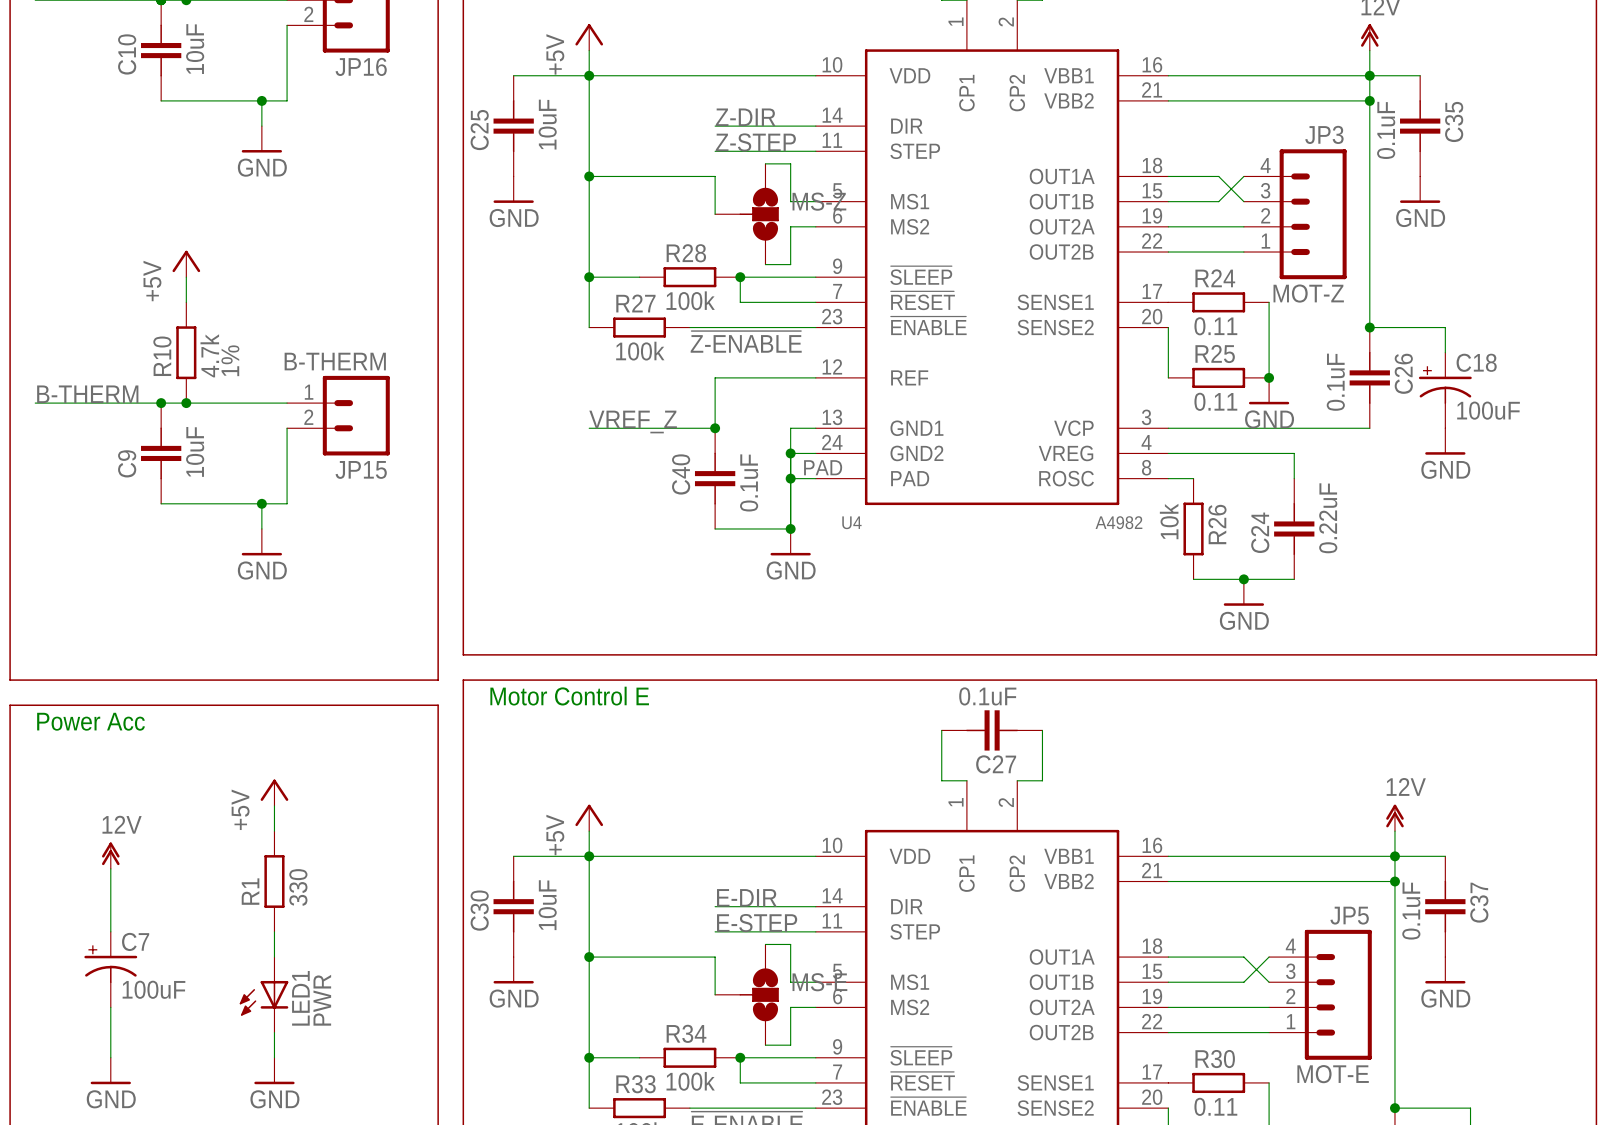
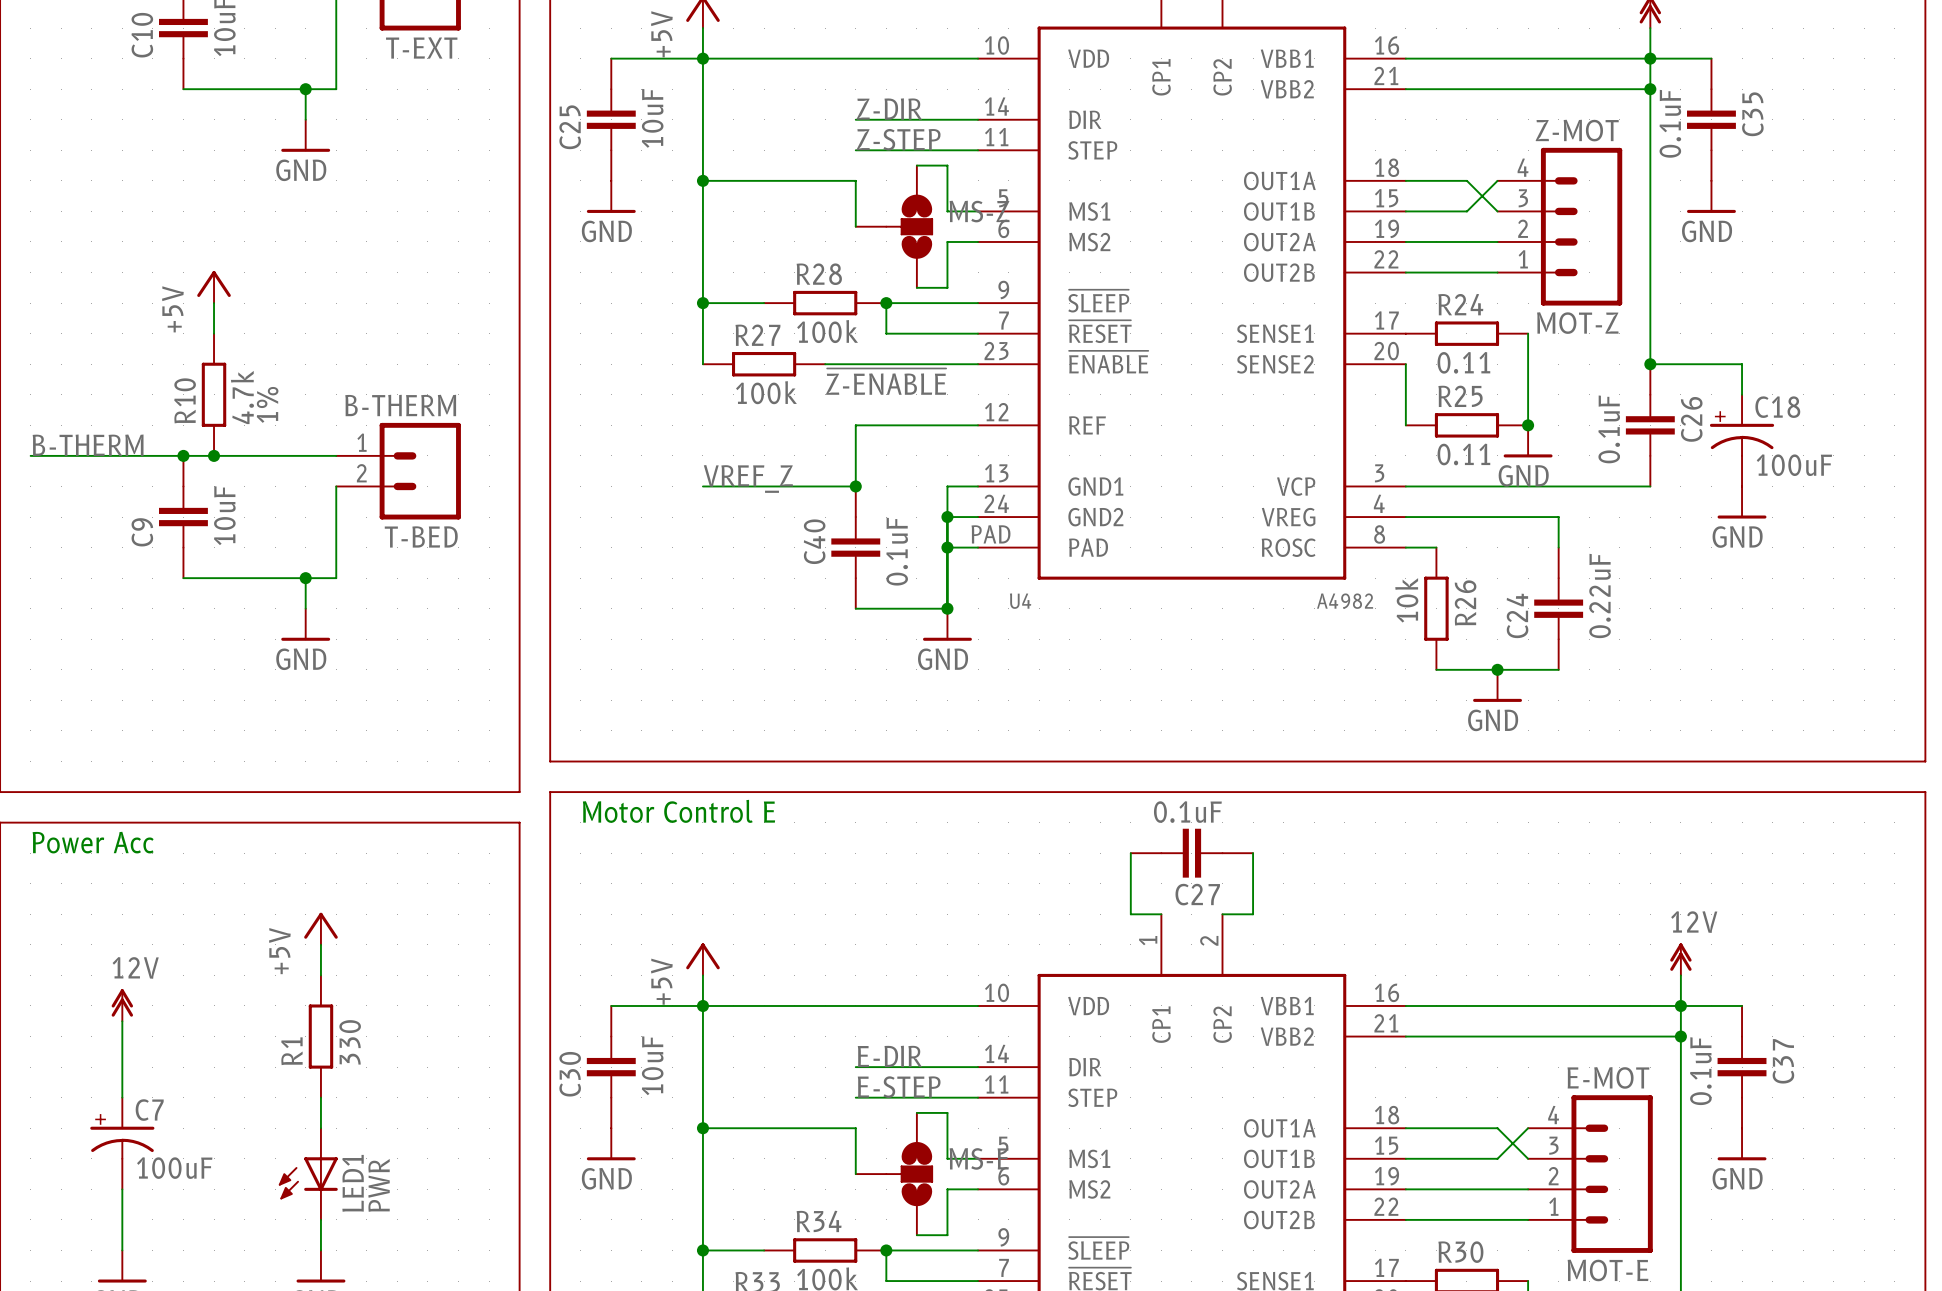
JP16 name: JP16 (361, 66) -> T-EXT (421, 47)
JP3 name: JP3 (1324, 134) -> Z-MOT (1577, 130)
JP15 name: JP15 (361, 469) -> T-BED (421, 536)
JP5 name: JP5 (1349, 915) -> E-MOT (1608, 1077)

